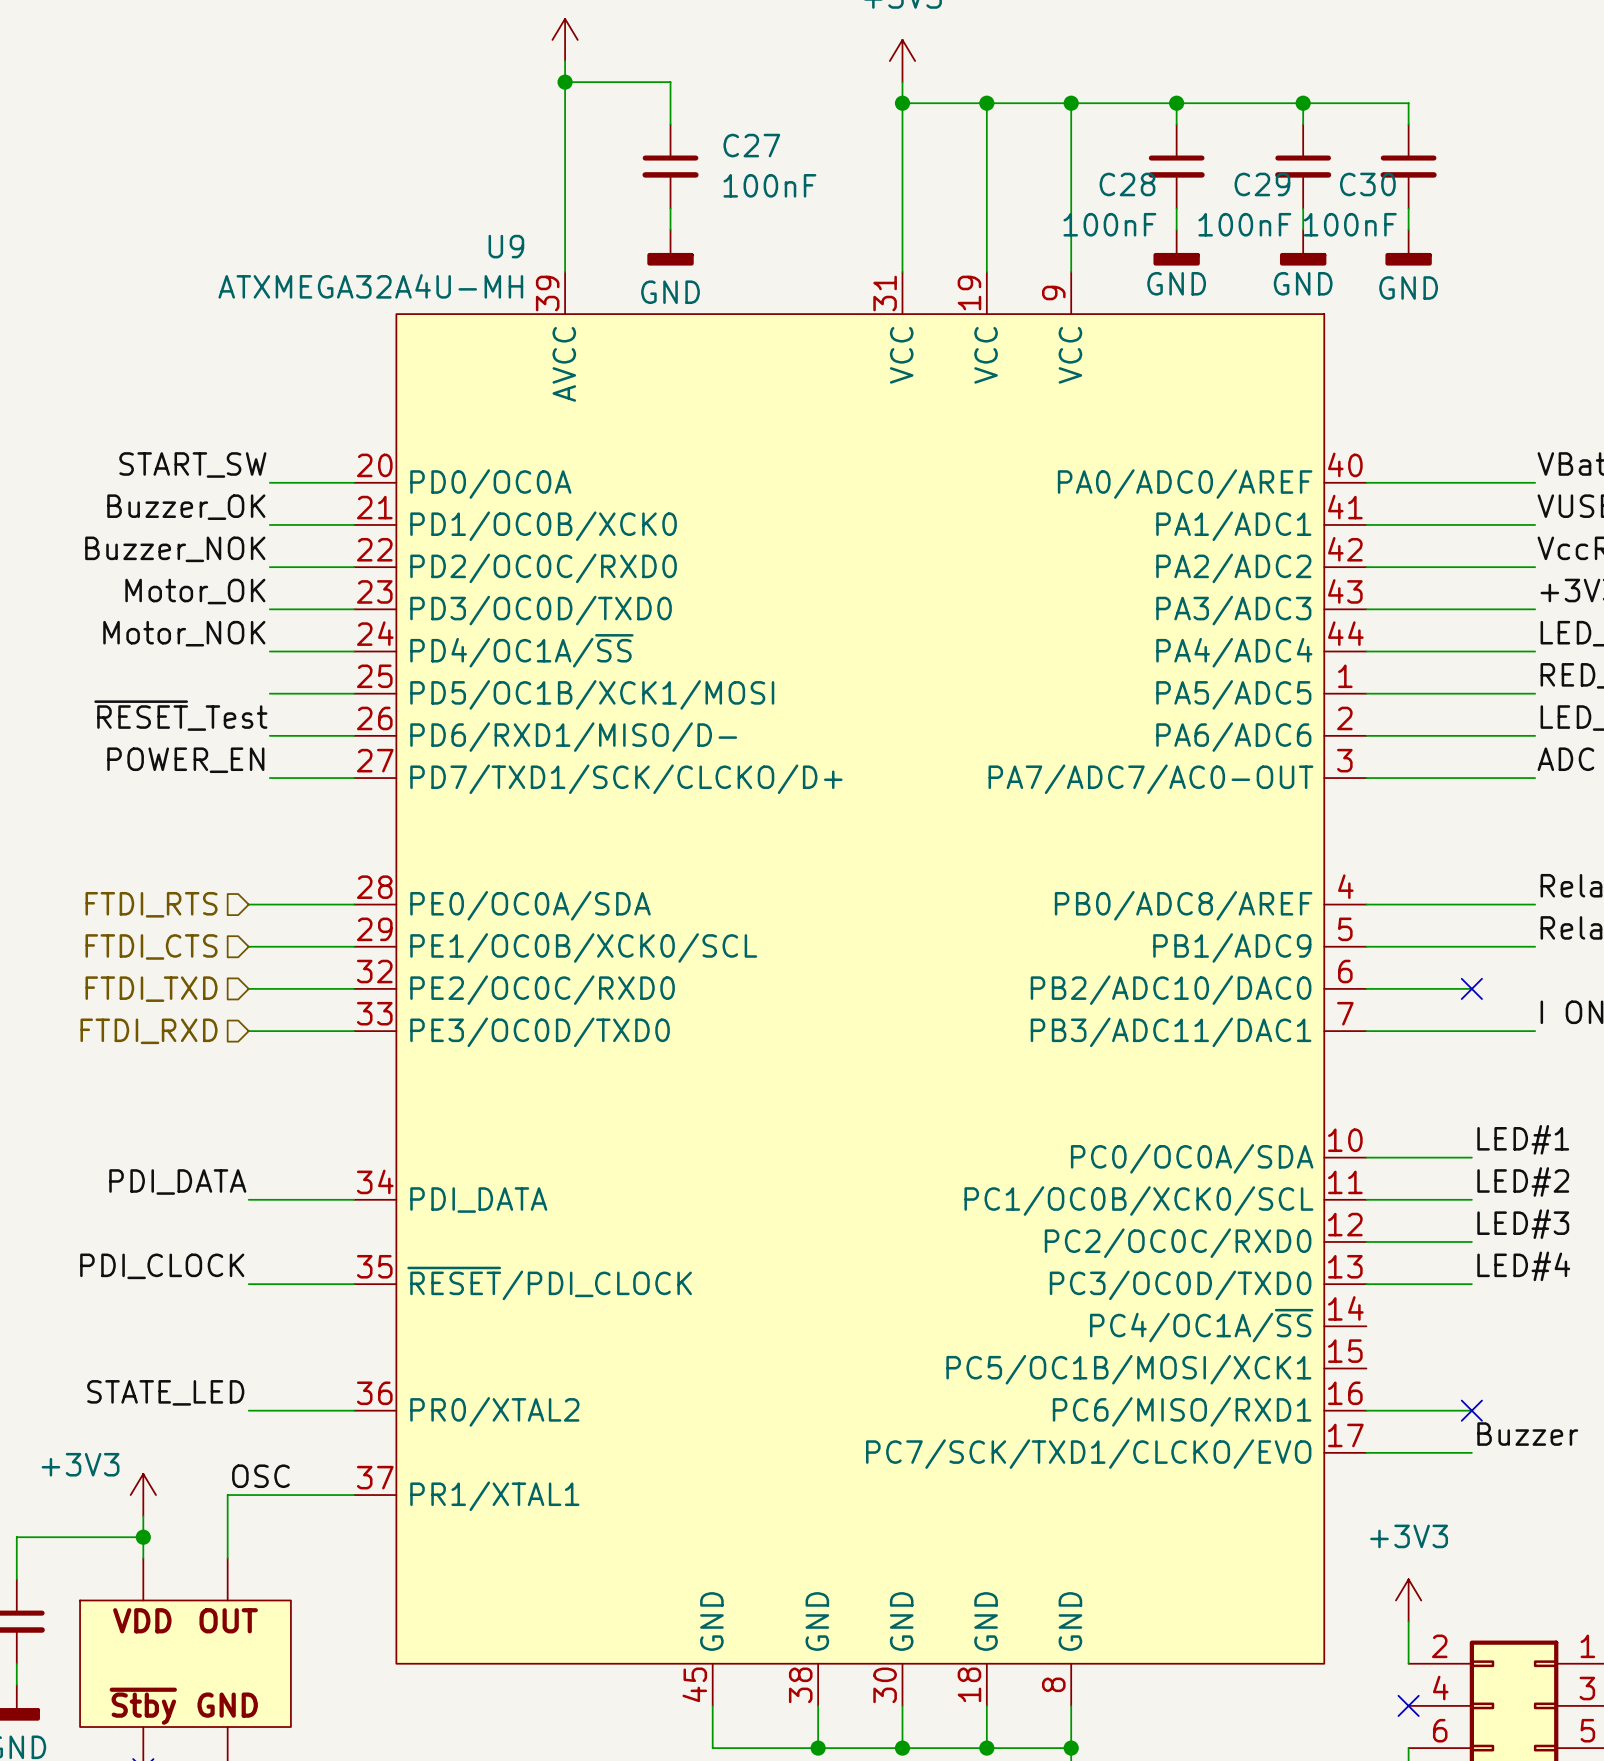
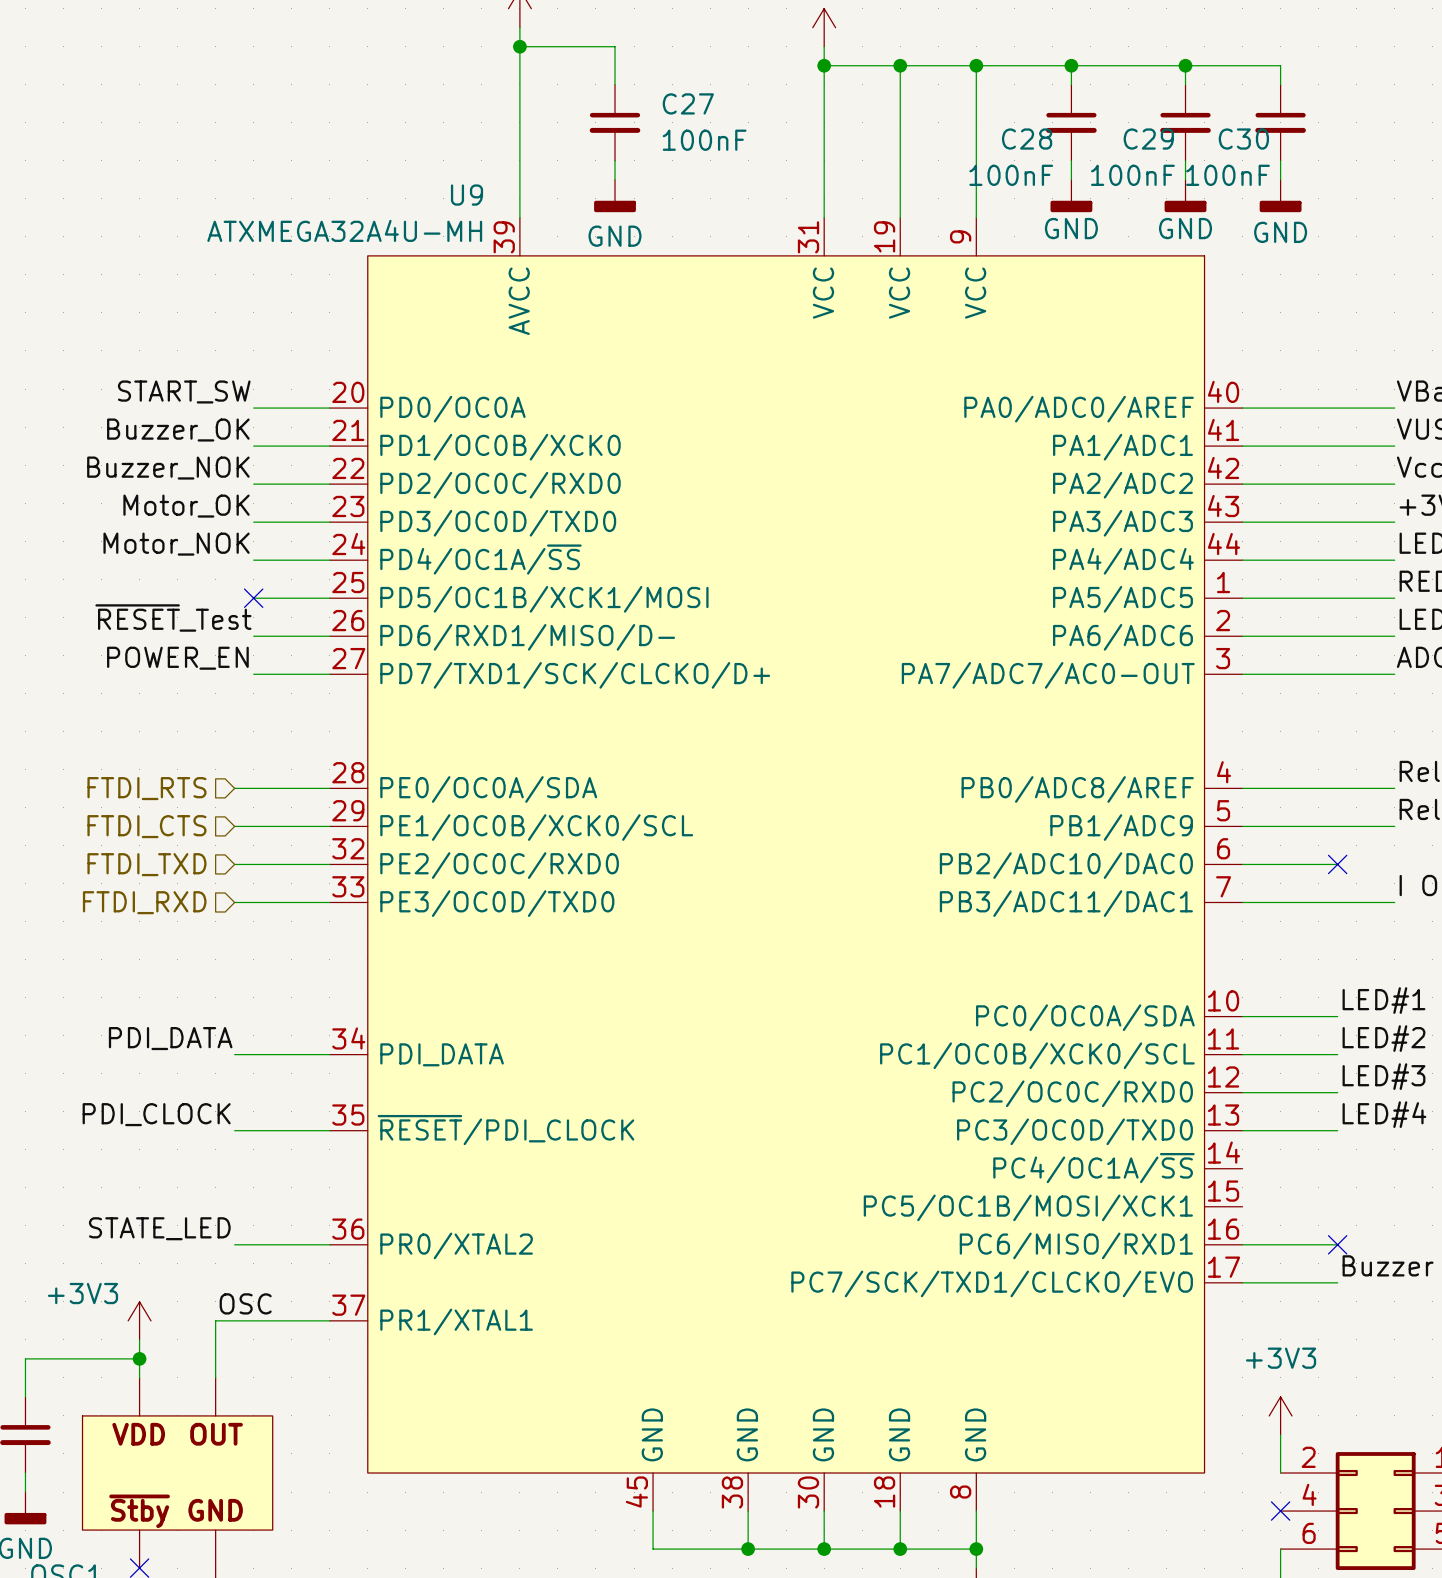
no-connect mark: none -> (253, 598)

